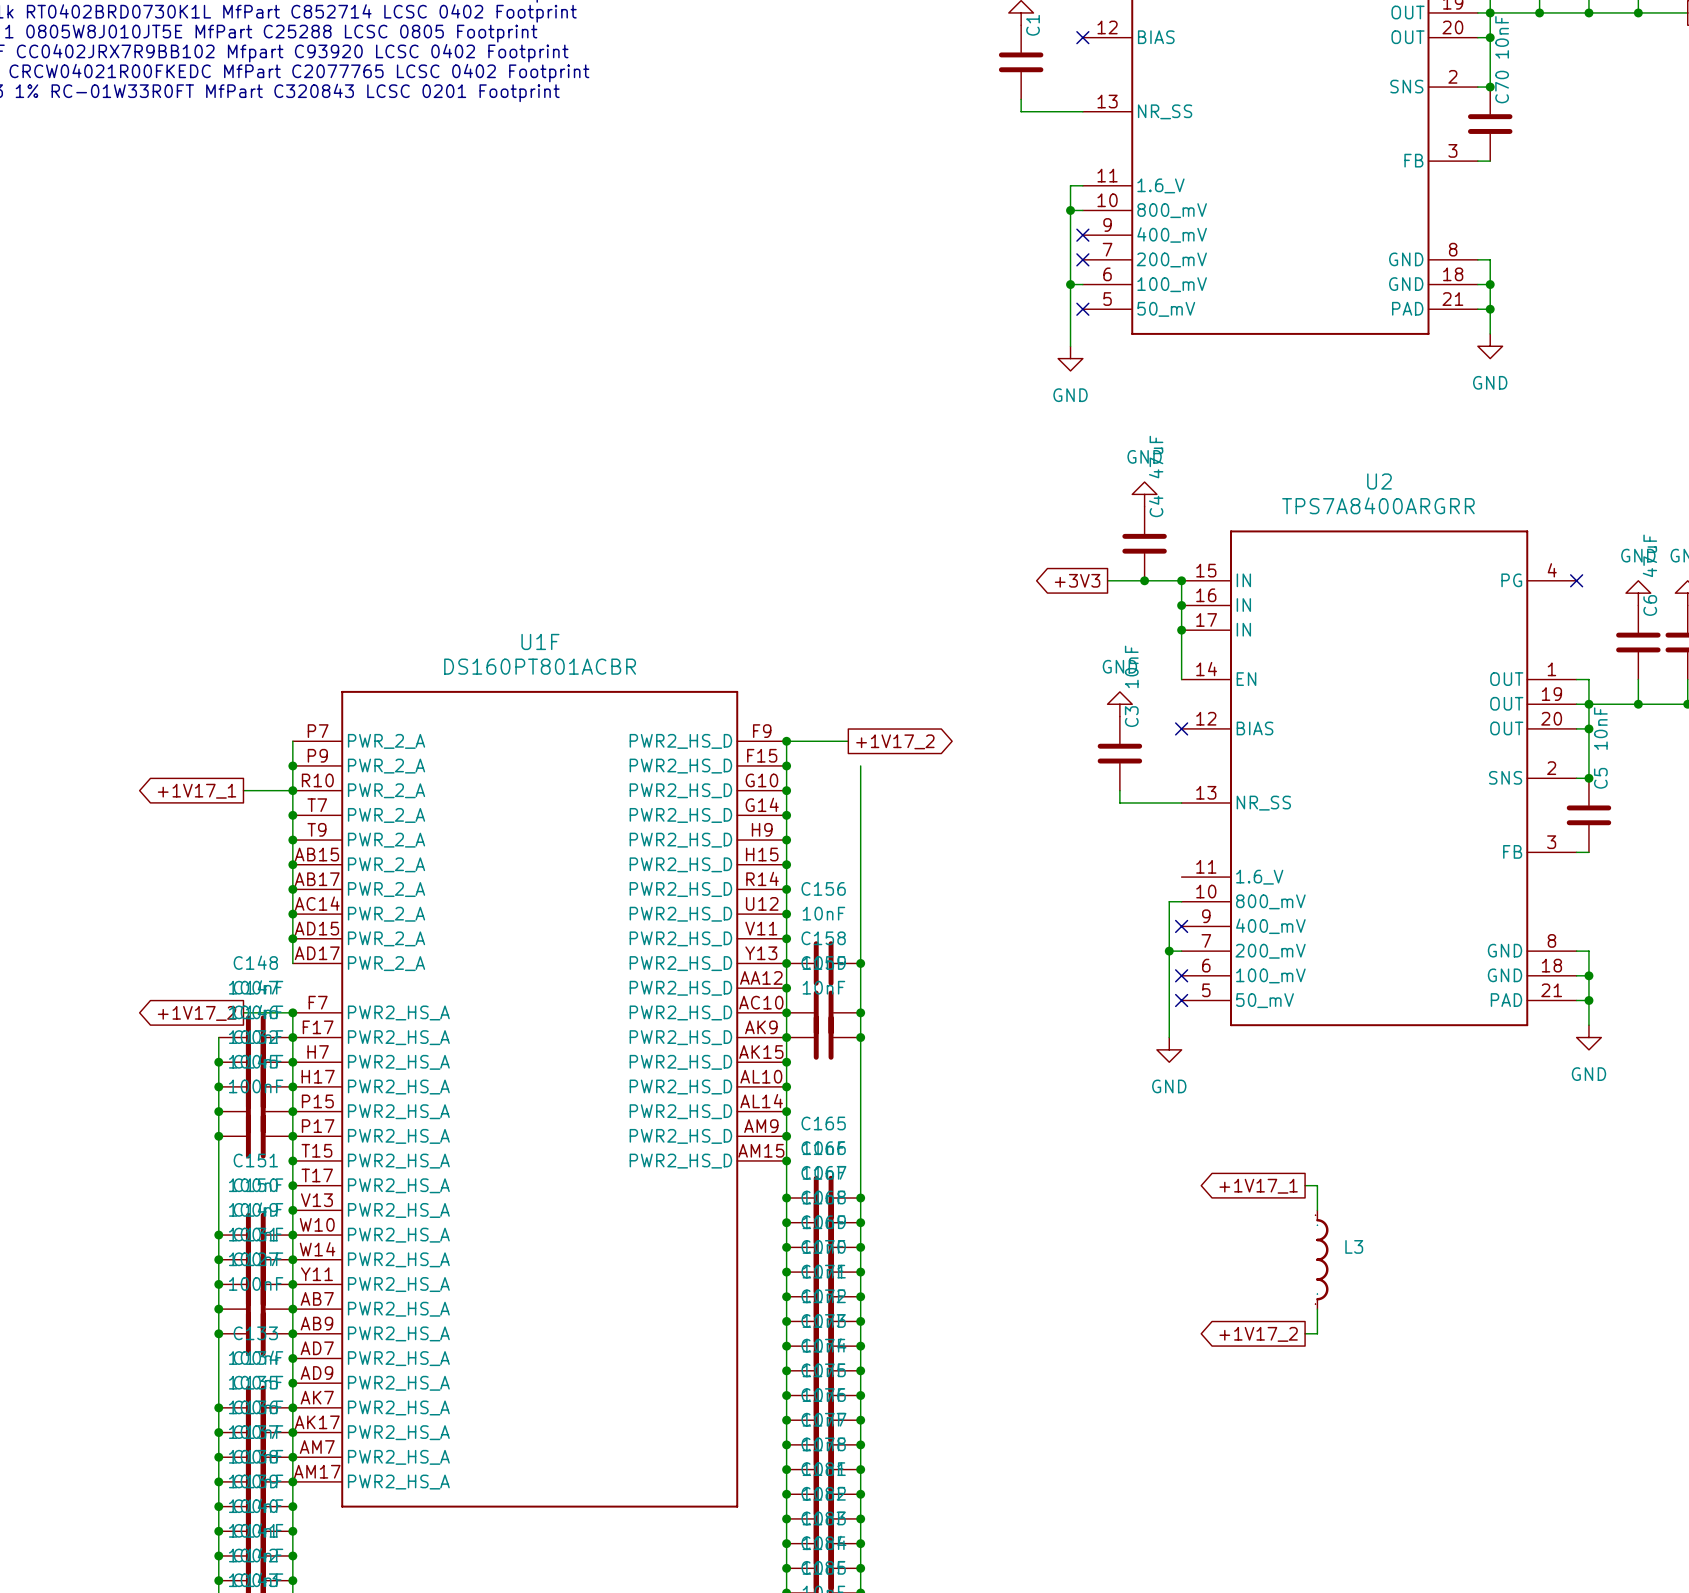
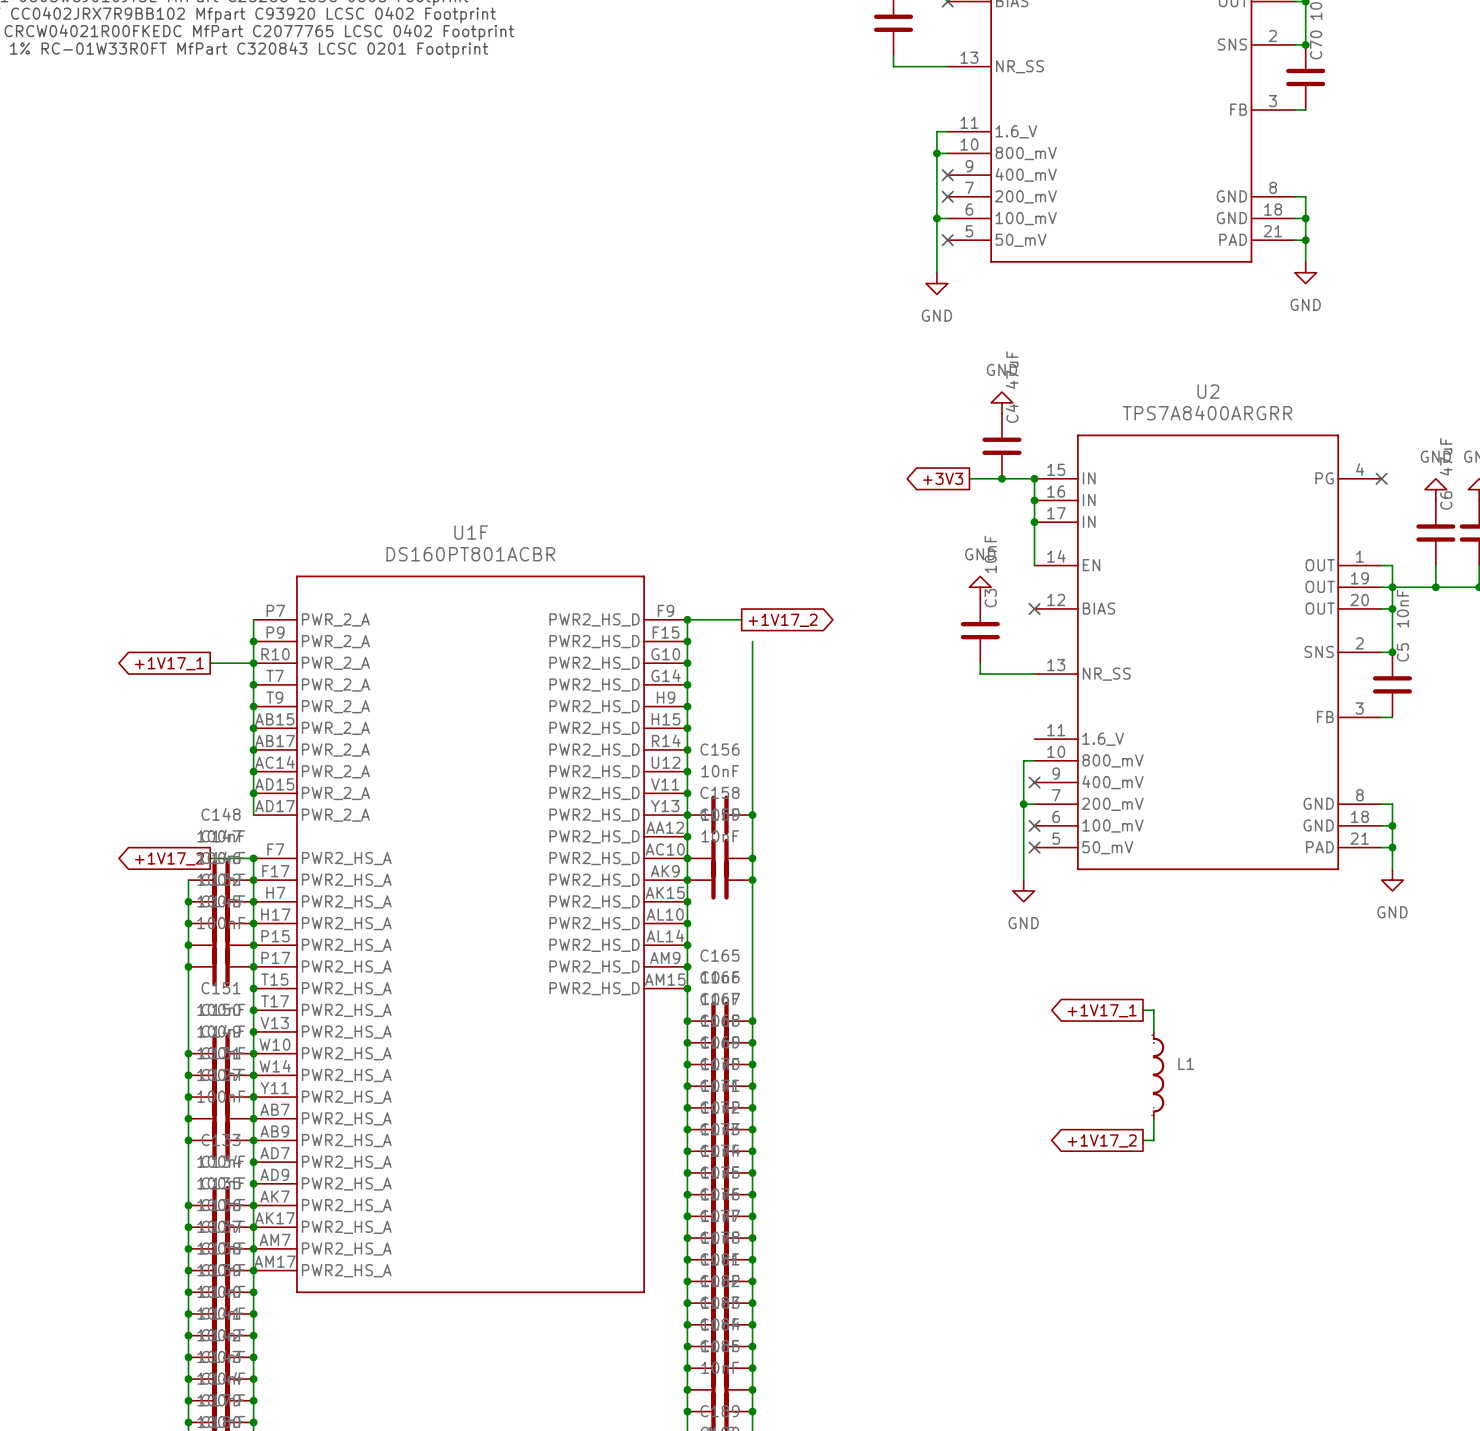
L3: (1322, 1259) -> none
L1: none -> (1158, 1075)

